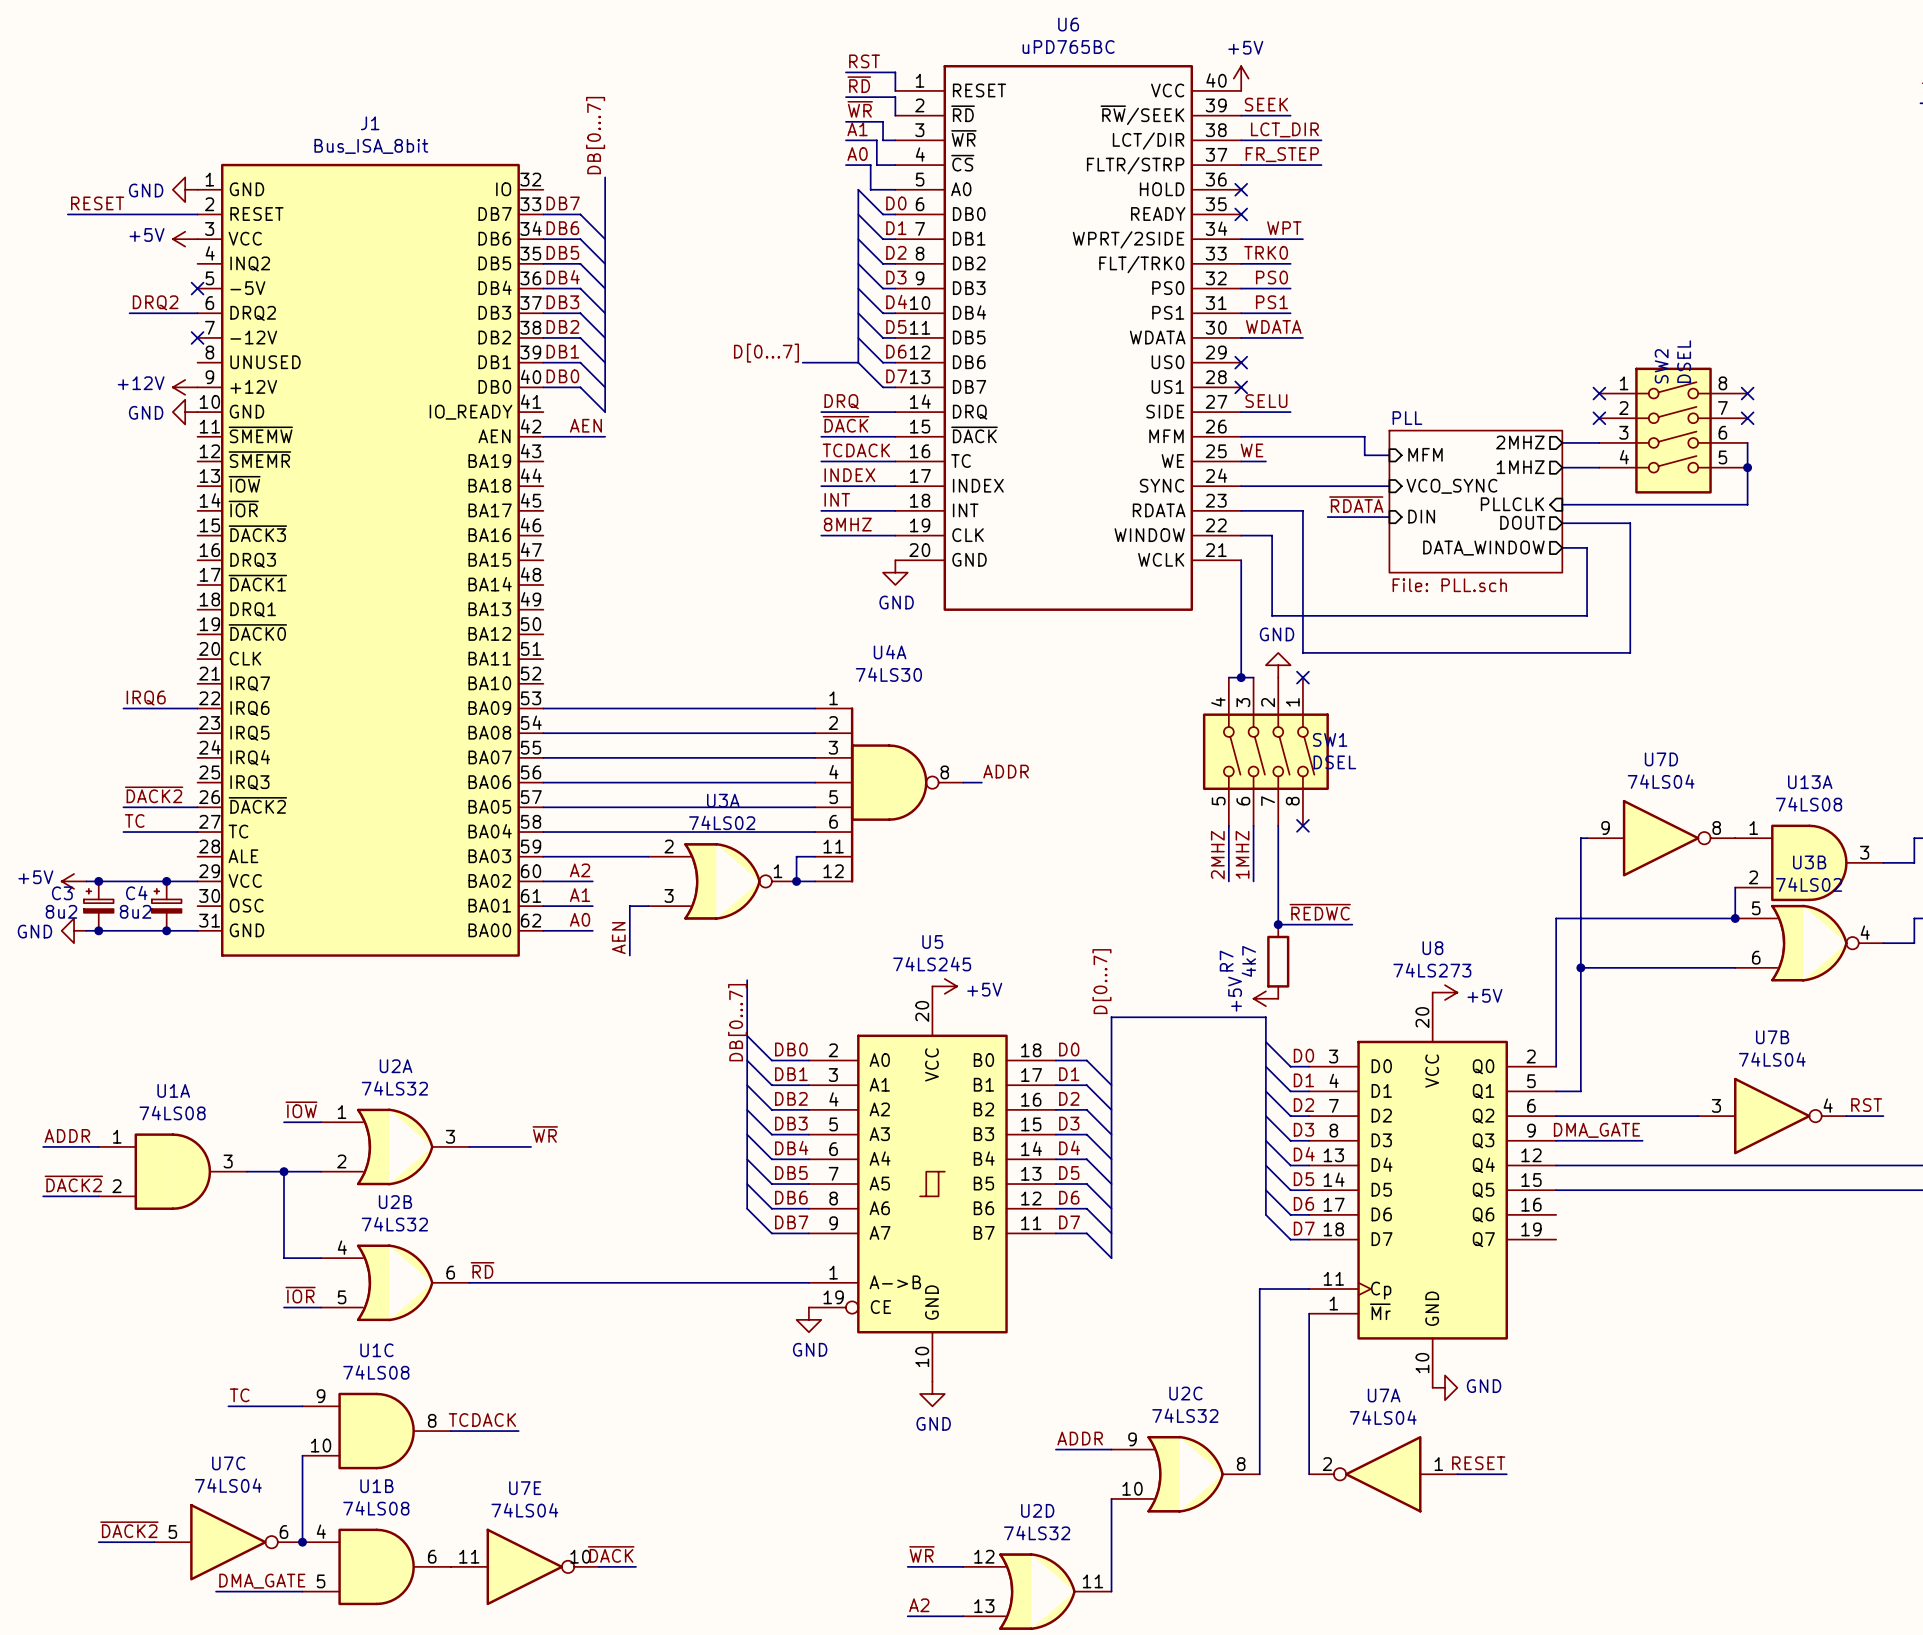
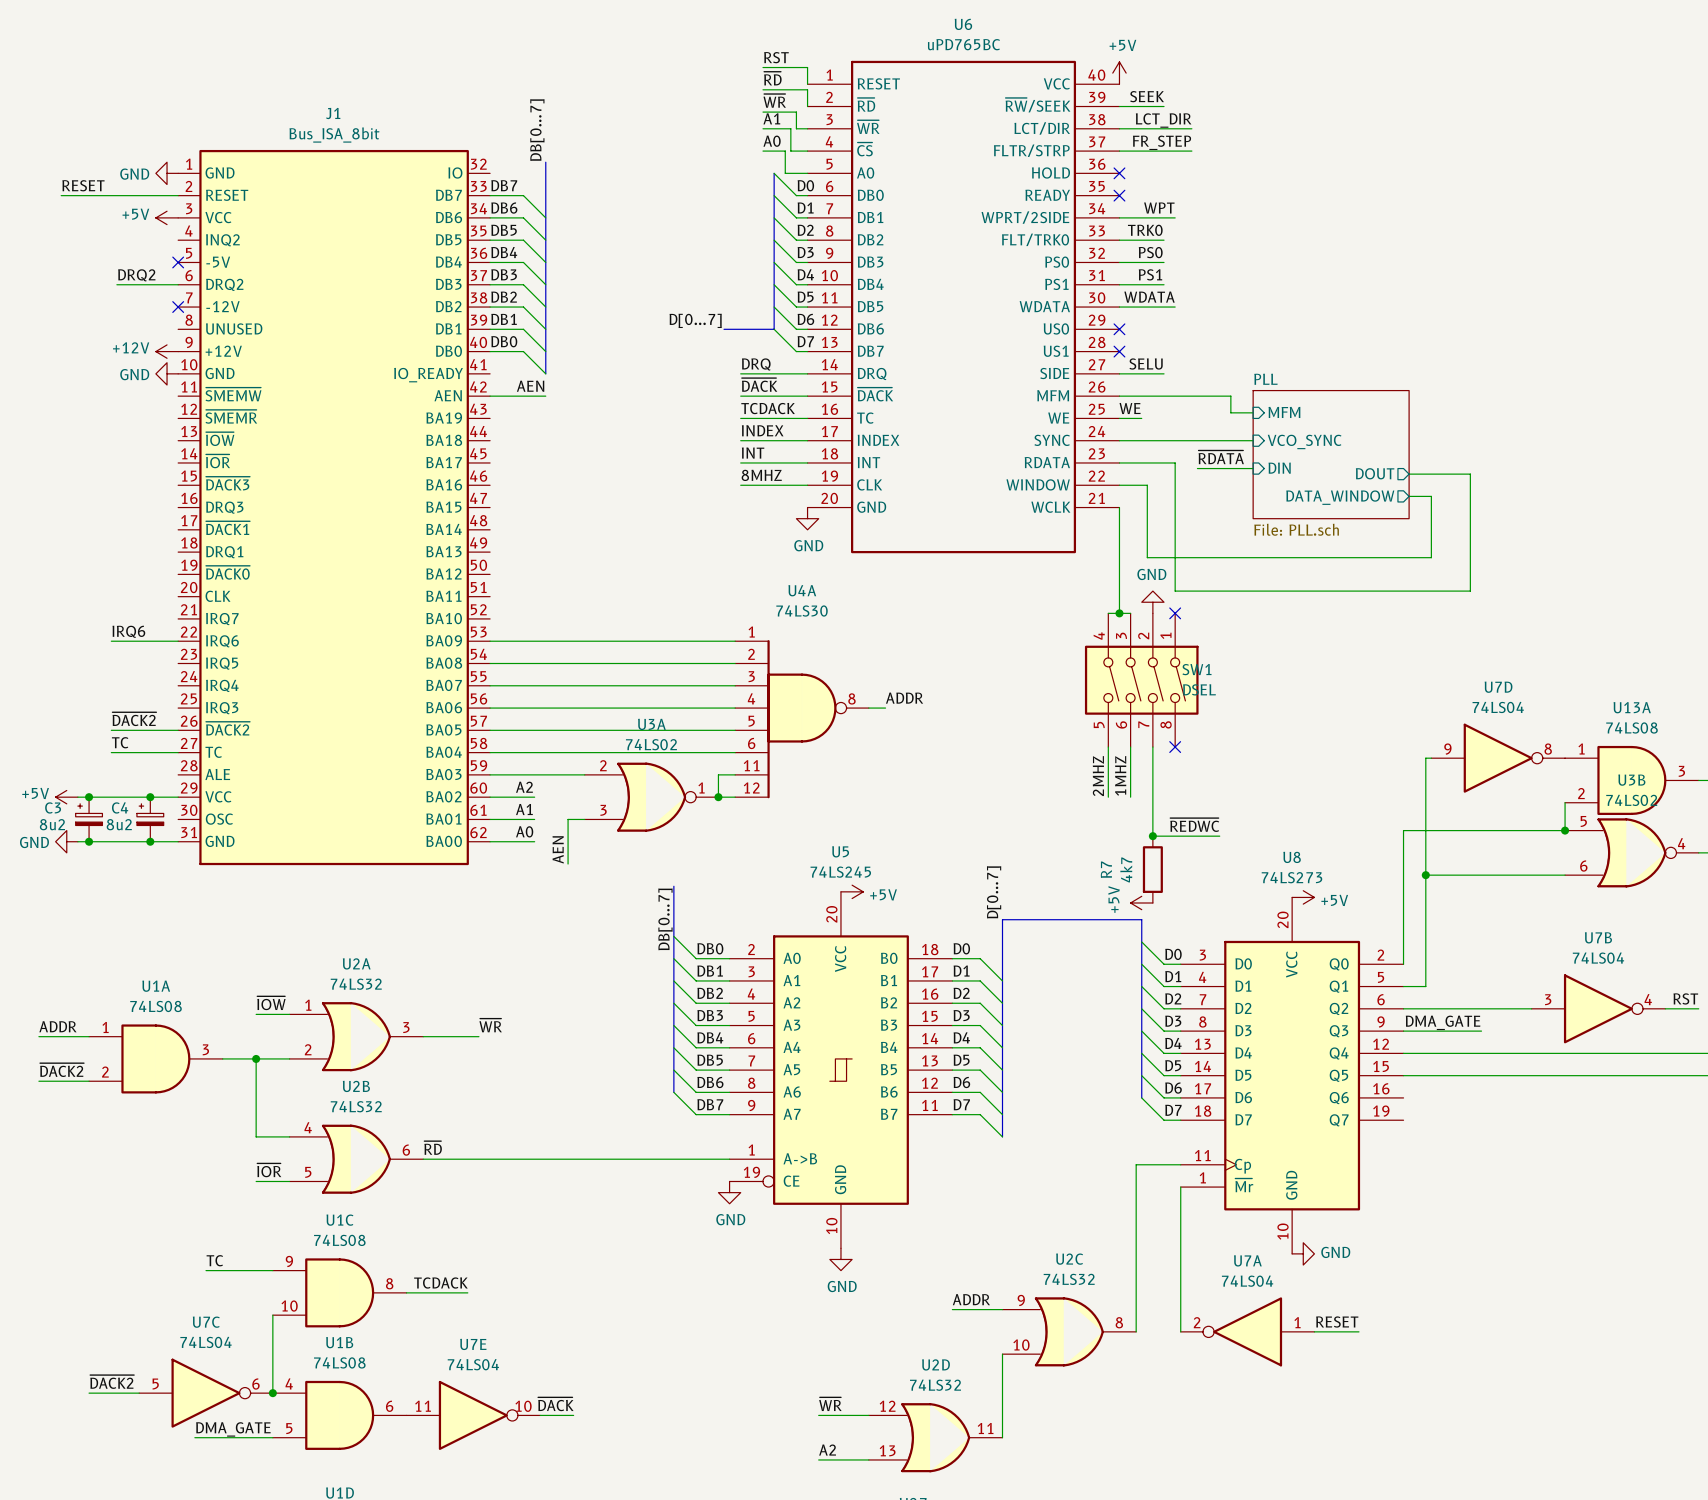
no-connect mark: (1599, 393) -> none
no-connect mark: (1747, 393) -> none
no-connect mark: (1599, 418) -> none
no-connect mark: (1747, 418) -> none
SW2: DSEL (1673, 430) -> none
sheet pin: 2MHZ (1520, 442) -> none
wire: (1562, 442) (1599, 442) -> none
wire: (1747, 442) (1747, 504) (1562, 504) -> none
sheet pin: 1MHZ (1520, 467) -> none
wire: (1562, 467) (1599, 467) -> none
junction: (1747, 467) -> none
sheet pin: PLLCLK (1512, 504) -> none

